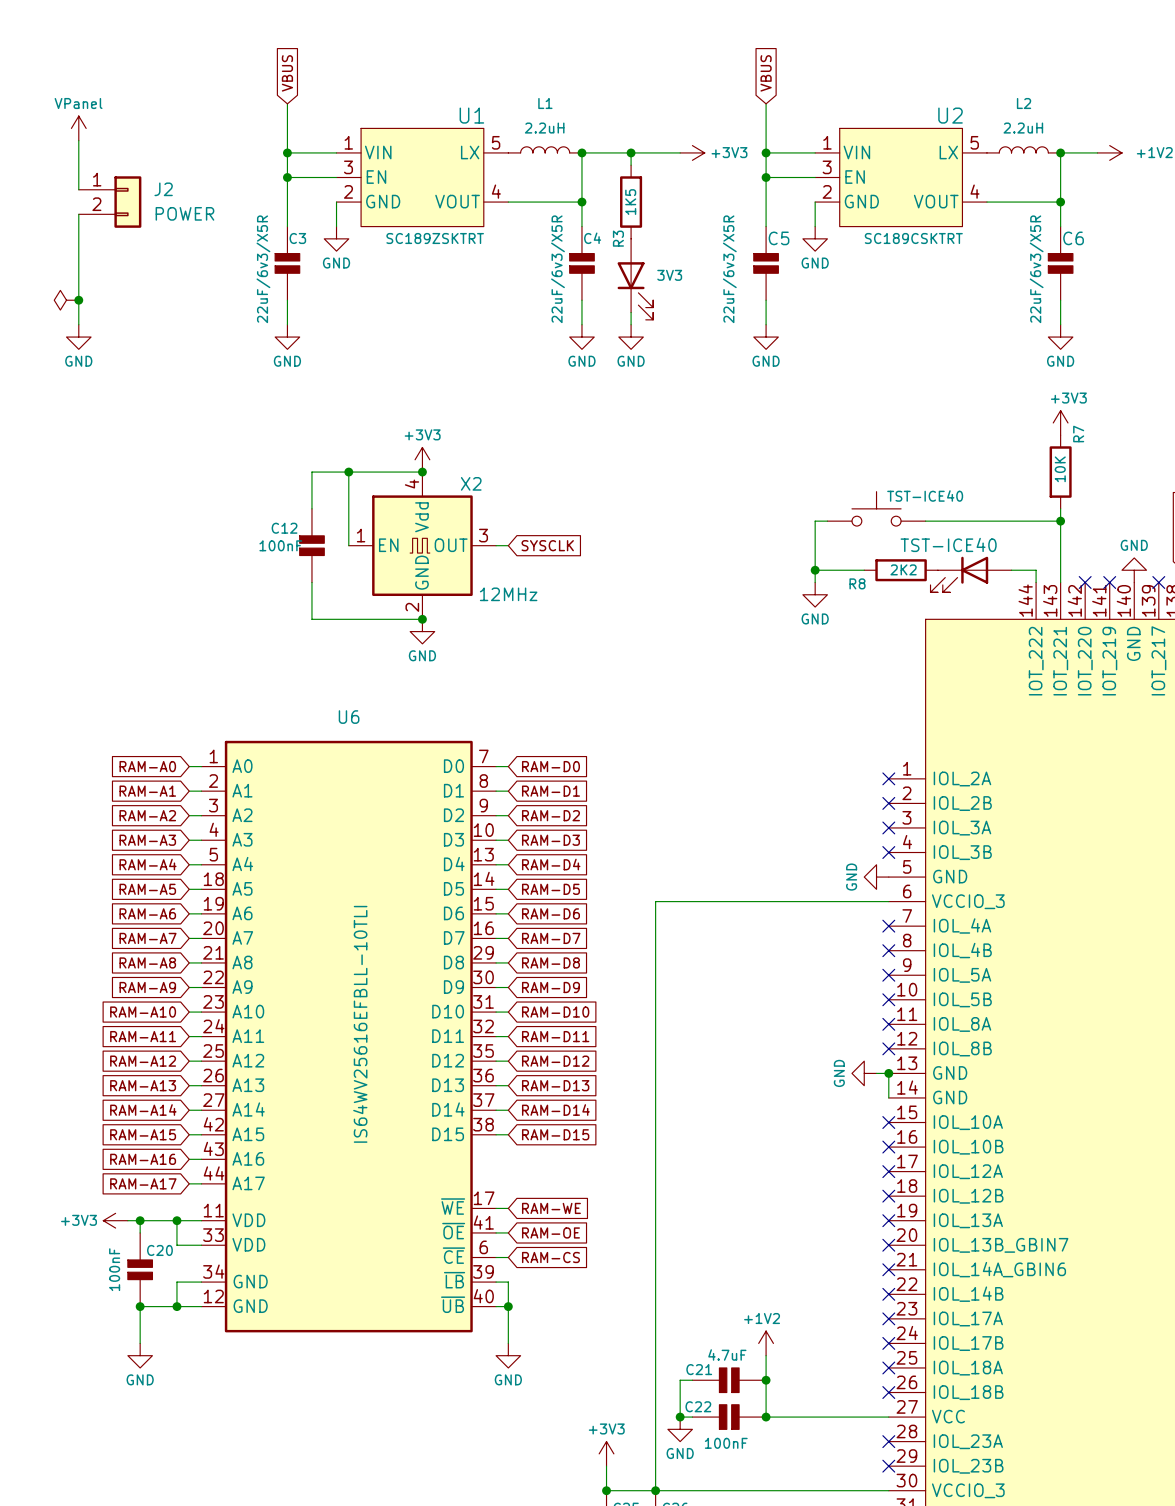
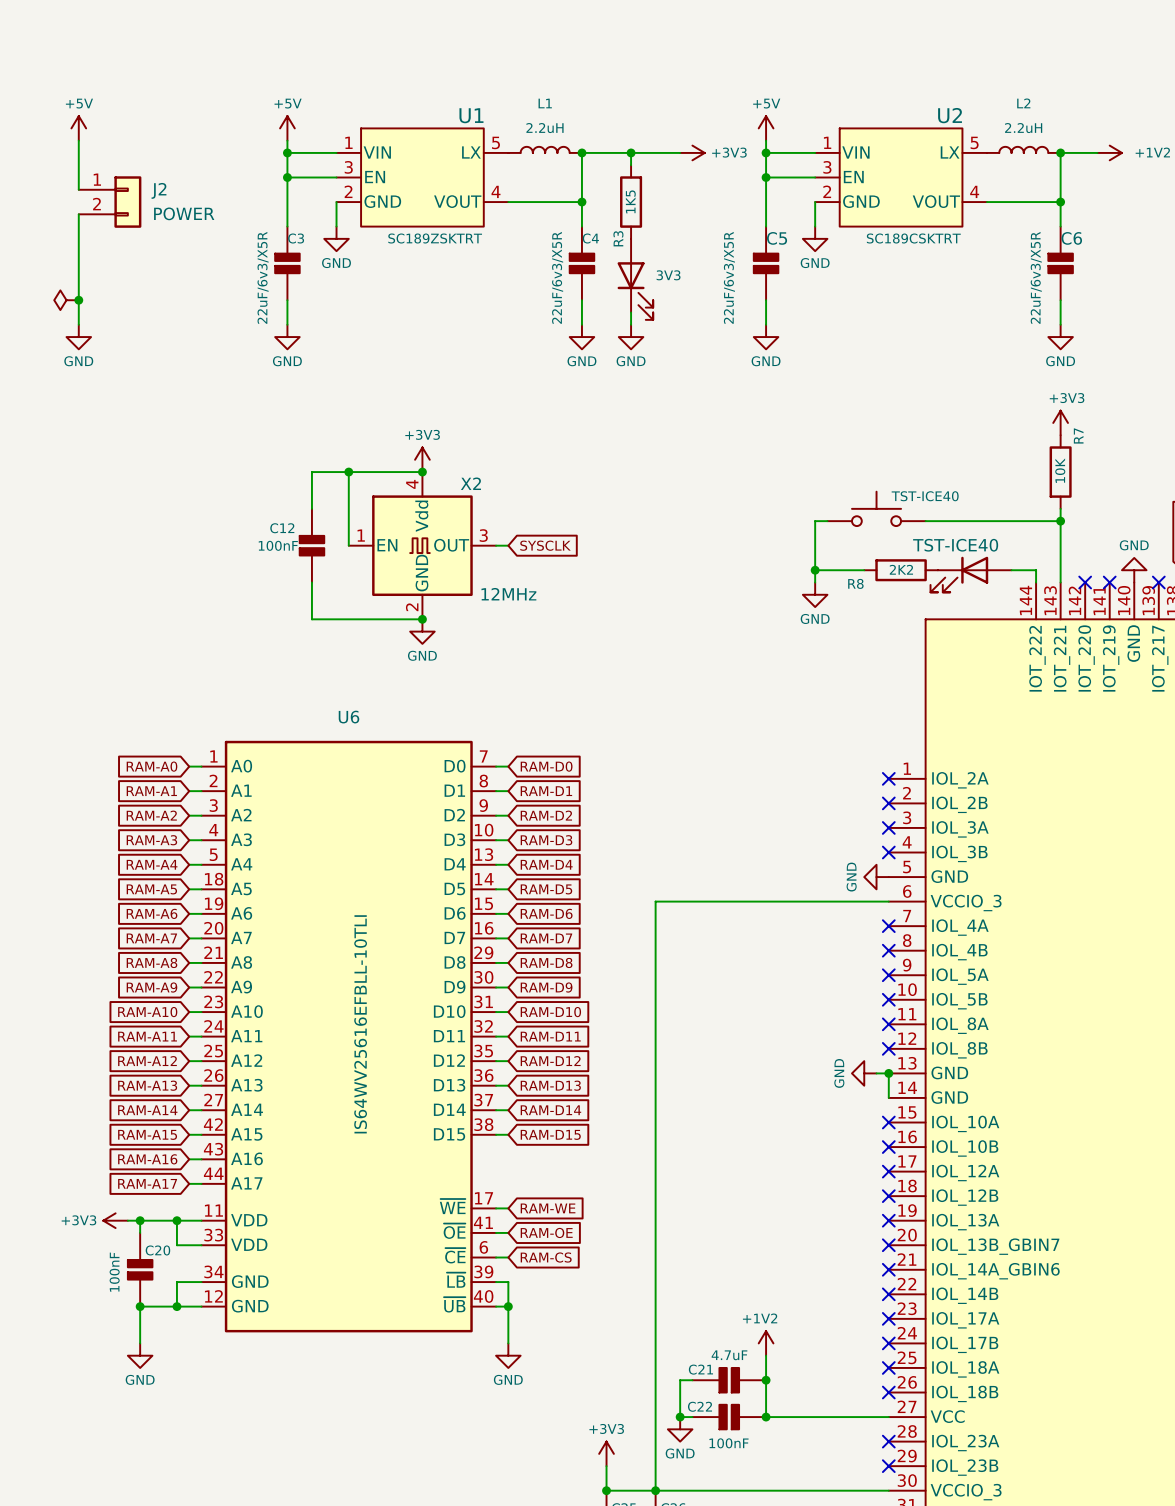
global label: VBUS (287, 73) -> none
global label: VBUS (766, 73) -> none
power symbol: VPanel (78, 128) -> +5V (78, 128)
power symbol: none -> +5V (287, 128)
power symbol: none -> +5V (766, 128)

